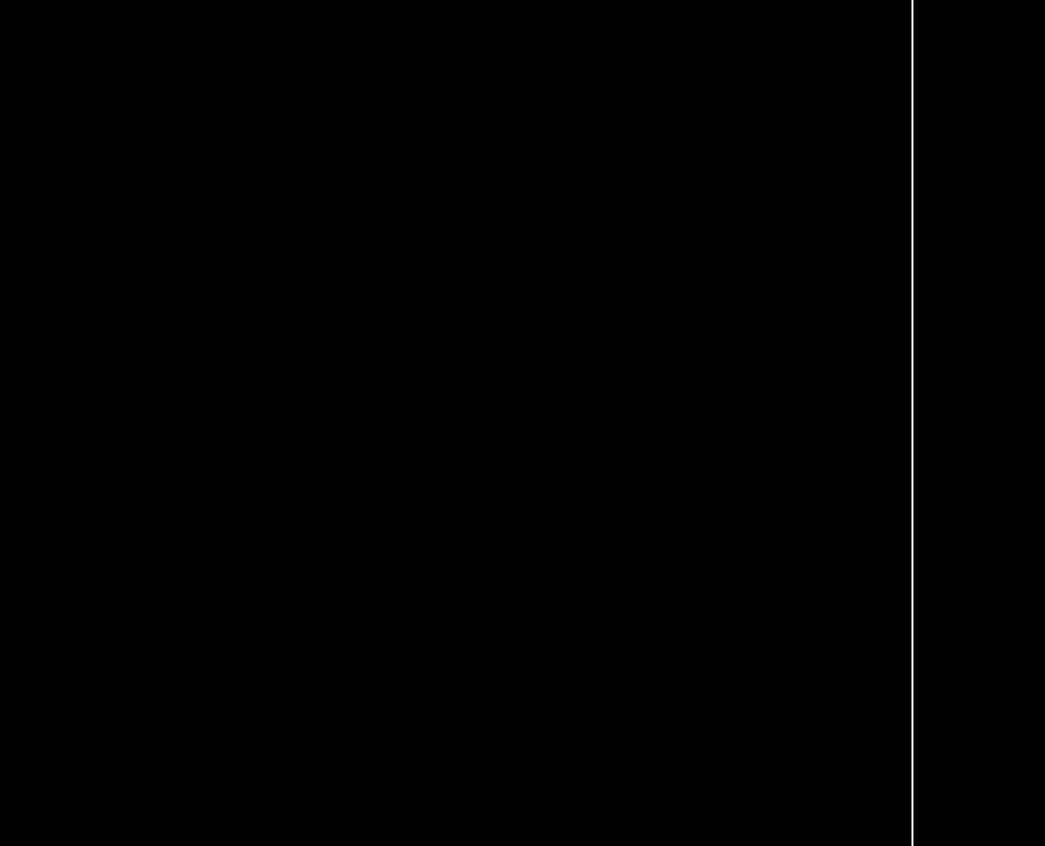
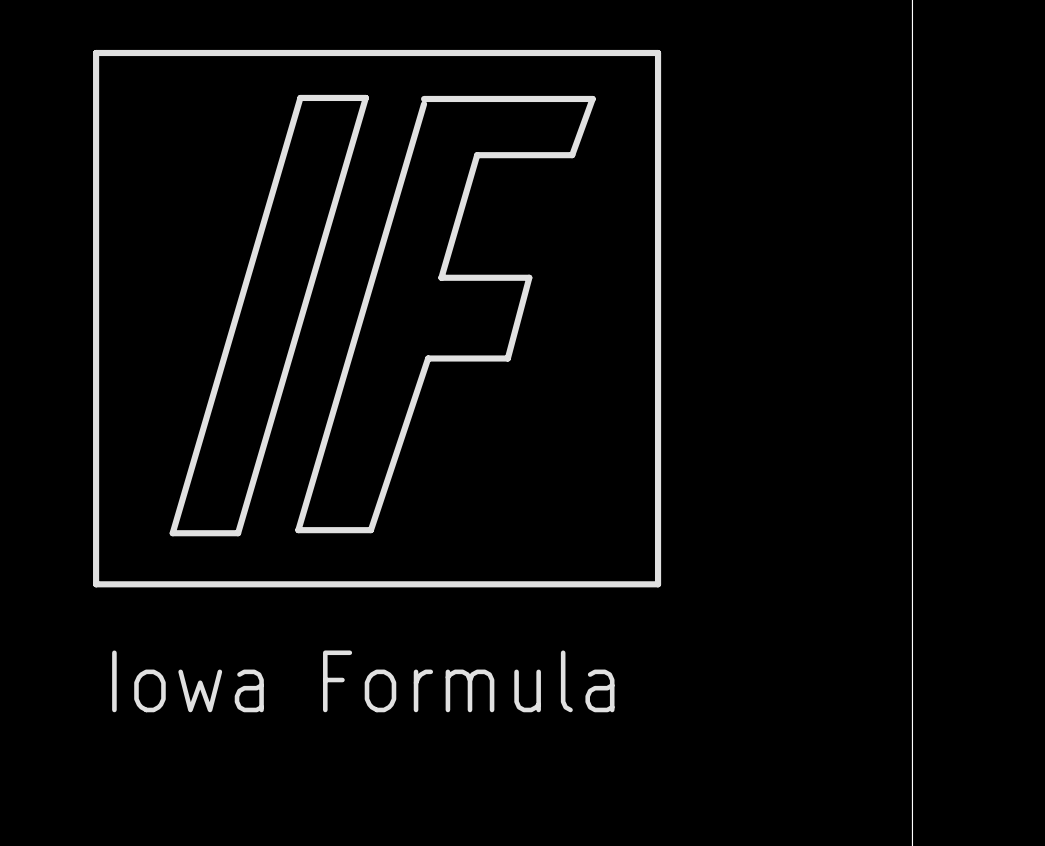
line: none -> (96, 52) (96, 584) (658, 584) (658, 52) (96, 52)
line: none -> (300, 97) (172, 533) (238, 533) (365, 97) (300, 97)
line: none -> (424, 98) (592, 98) (572, 155) (477, 155) (441, 277) (529, 277) (507, 358) (428, 358) (370, 530) (298, 530) (424, 104)
text: none -> Iowa Formula (363, 681)

